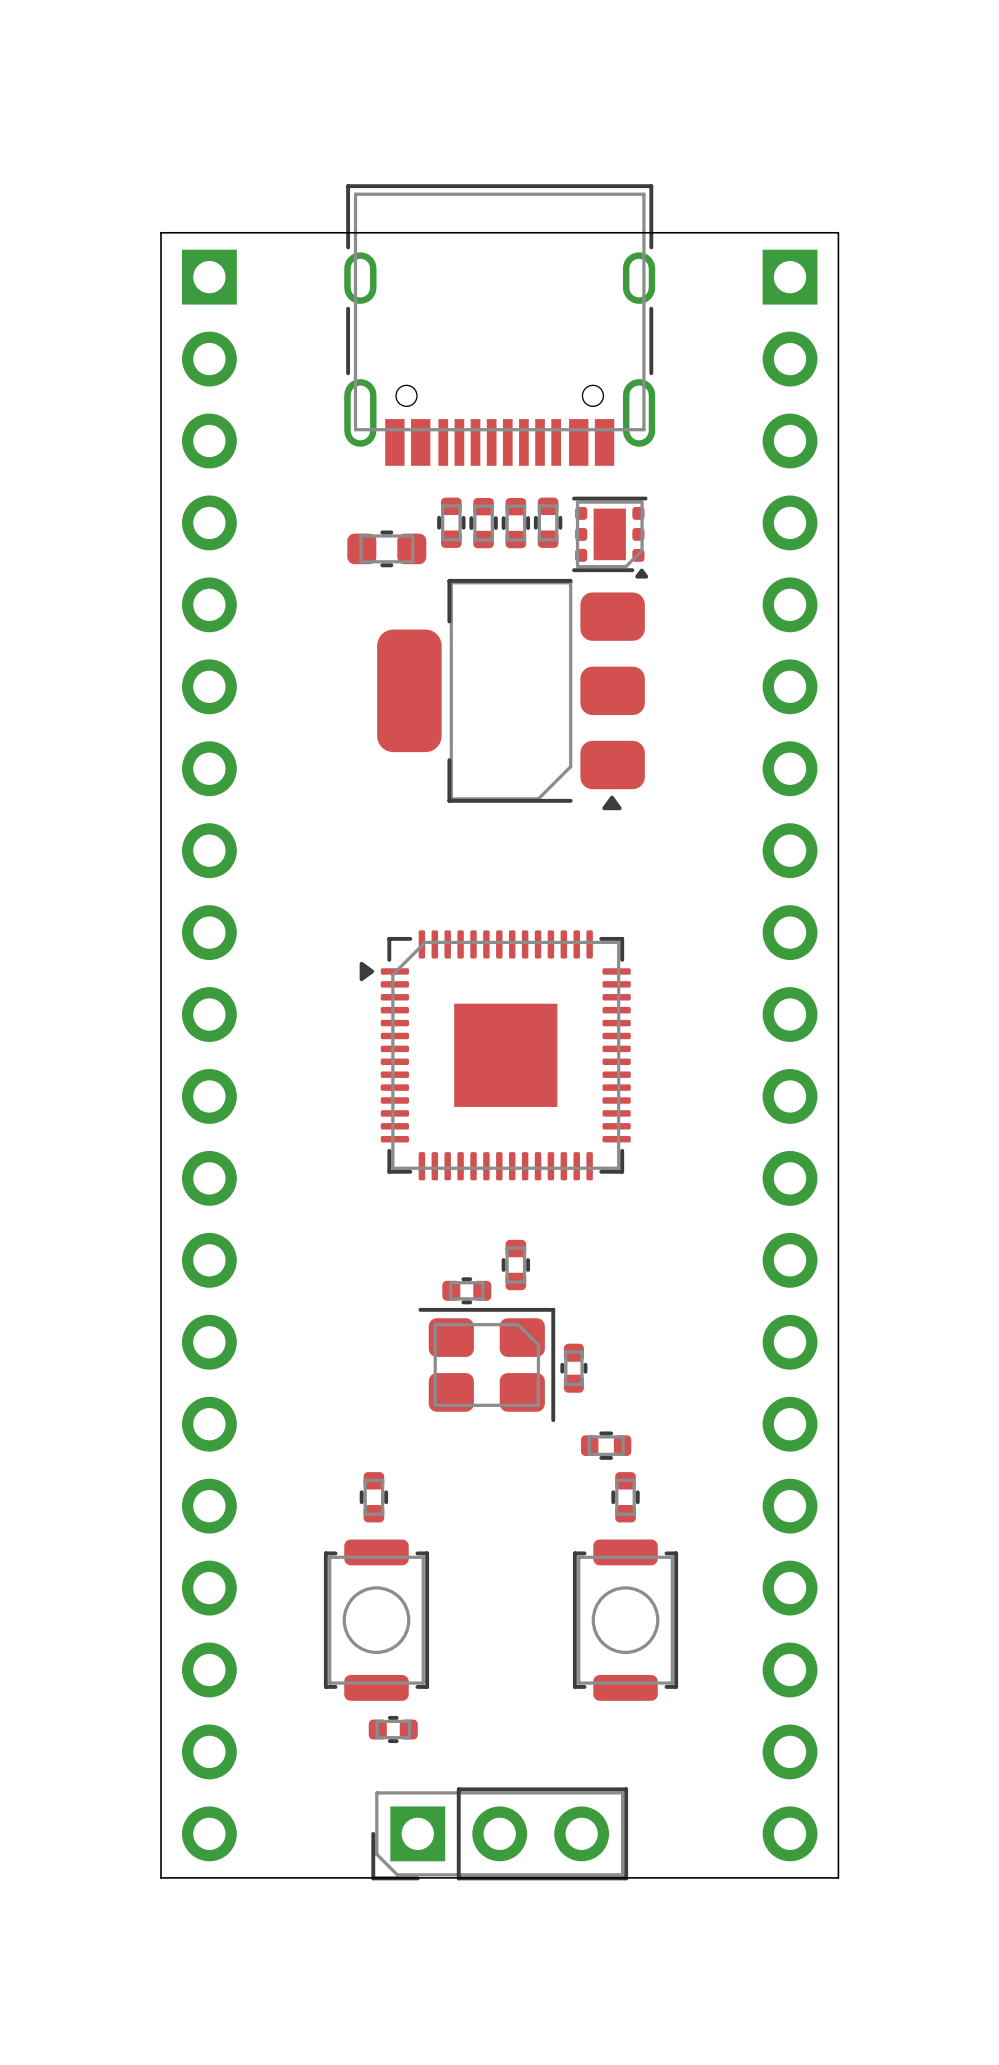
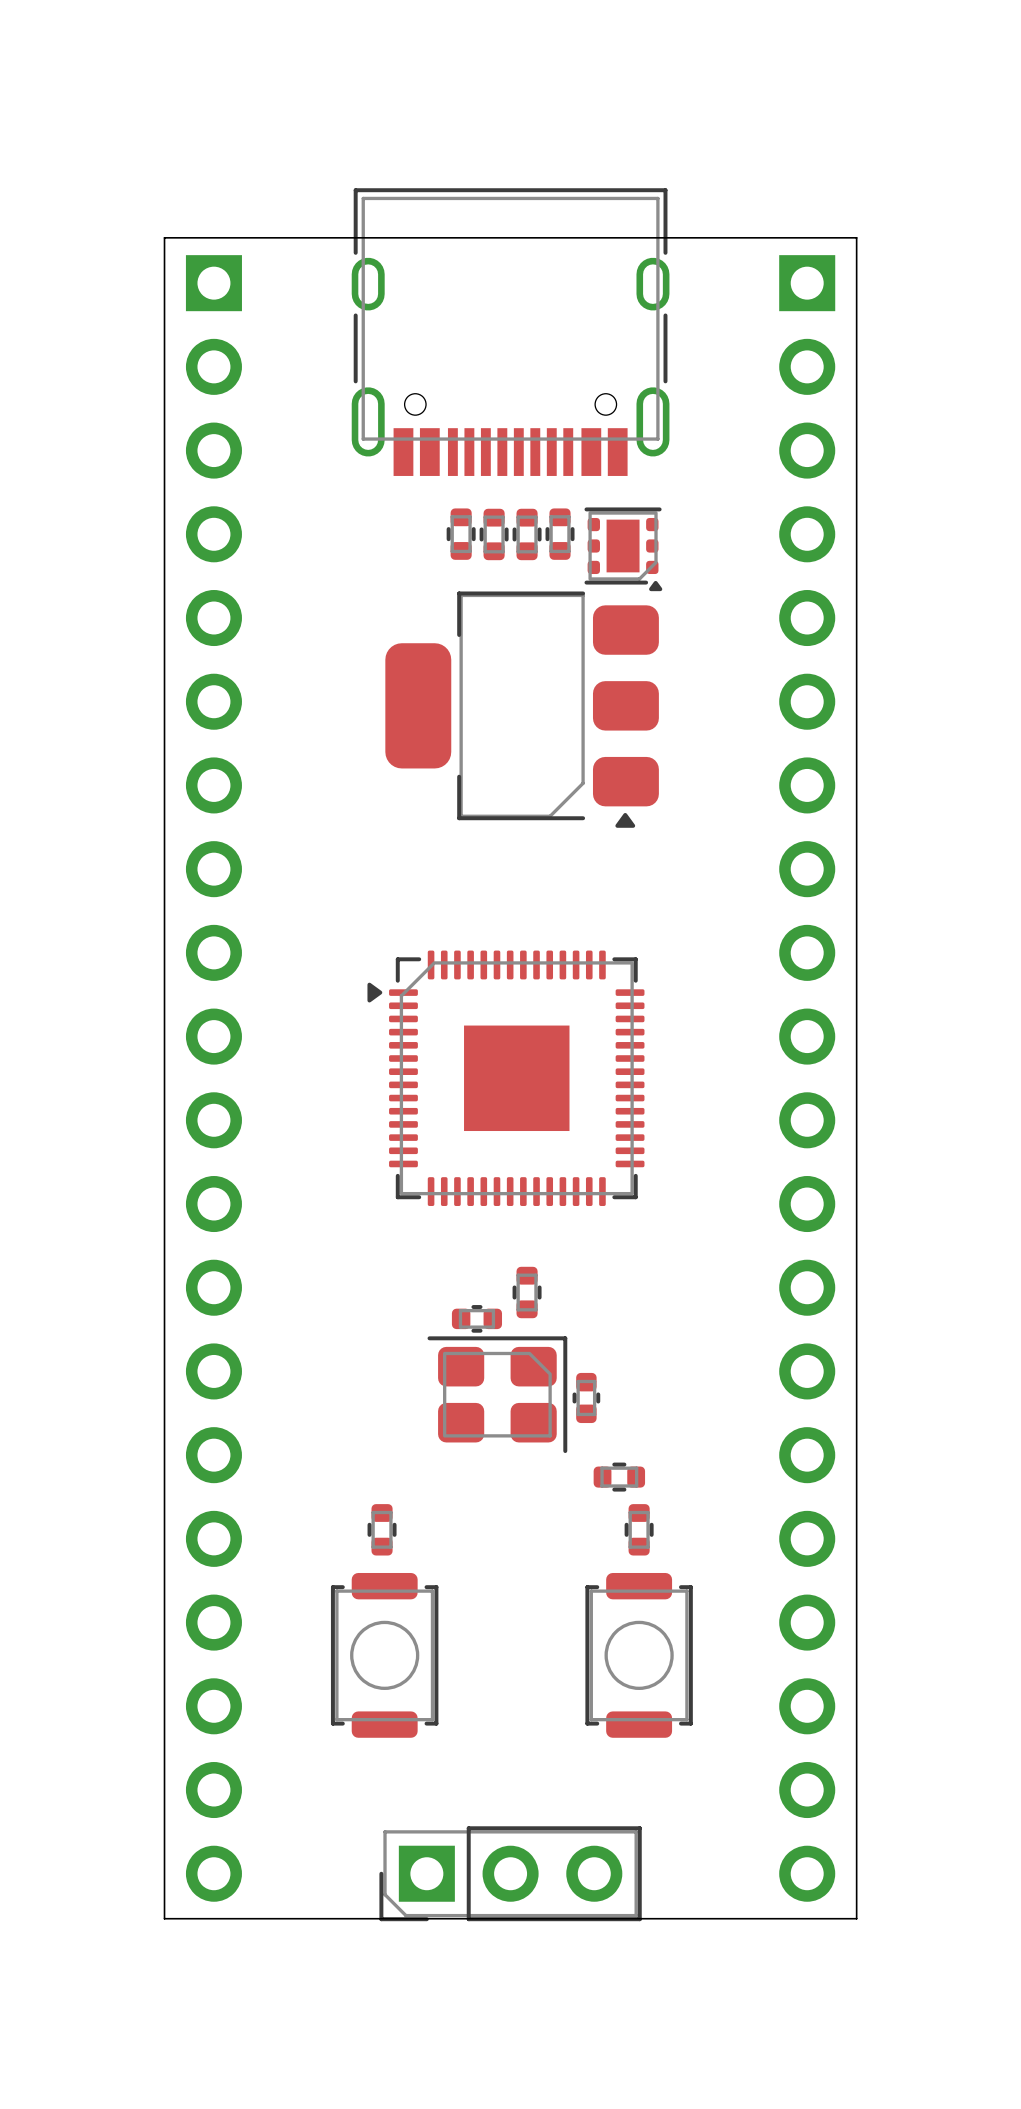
part: (386, 548) -> none
part: (393, 1729) -> none

